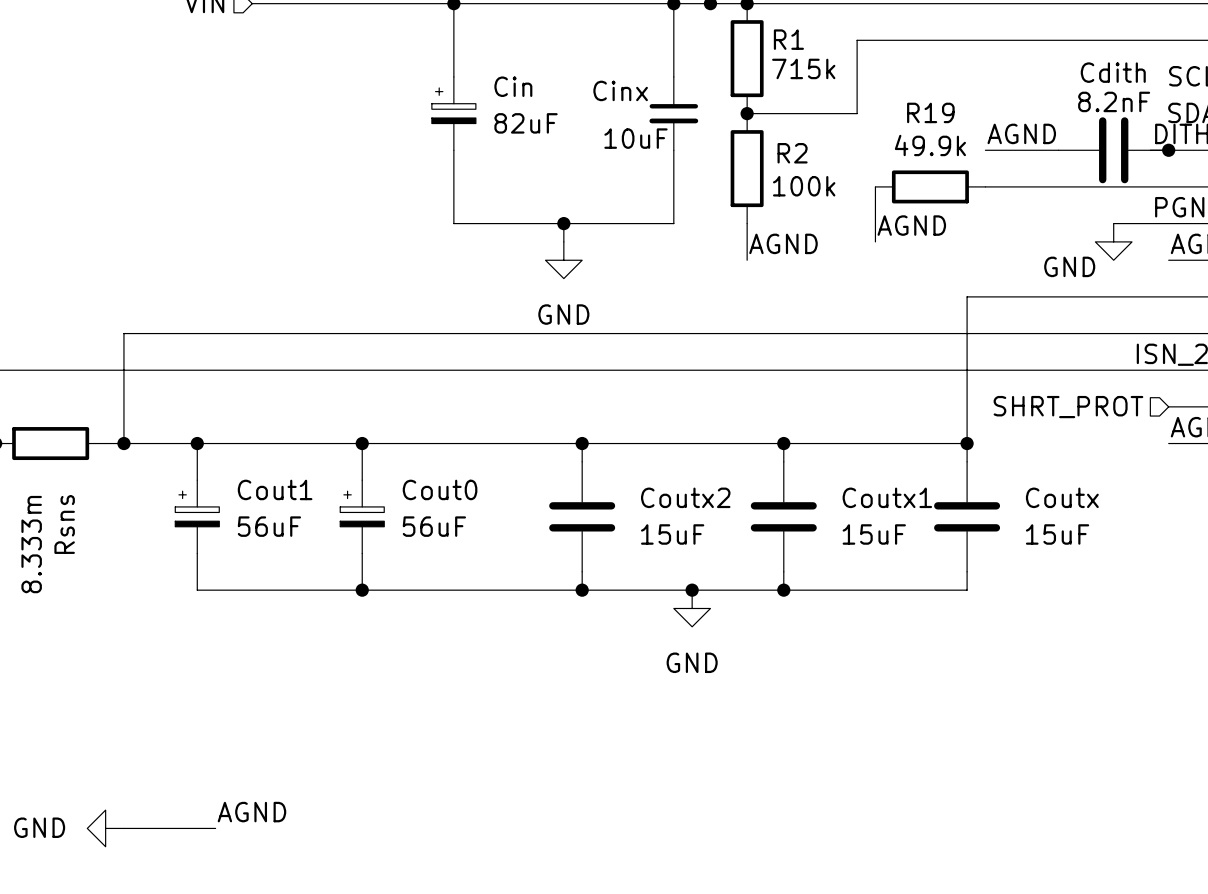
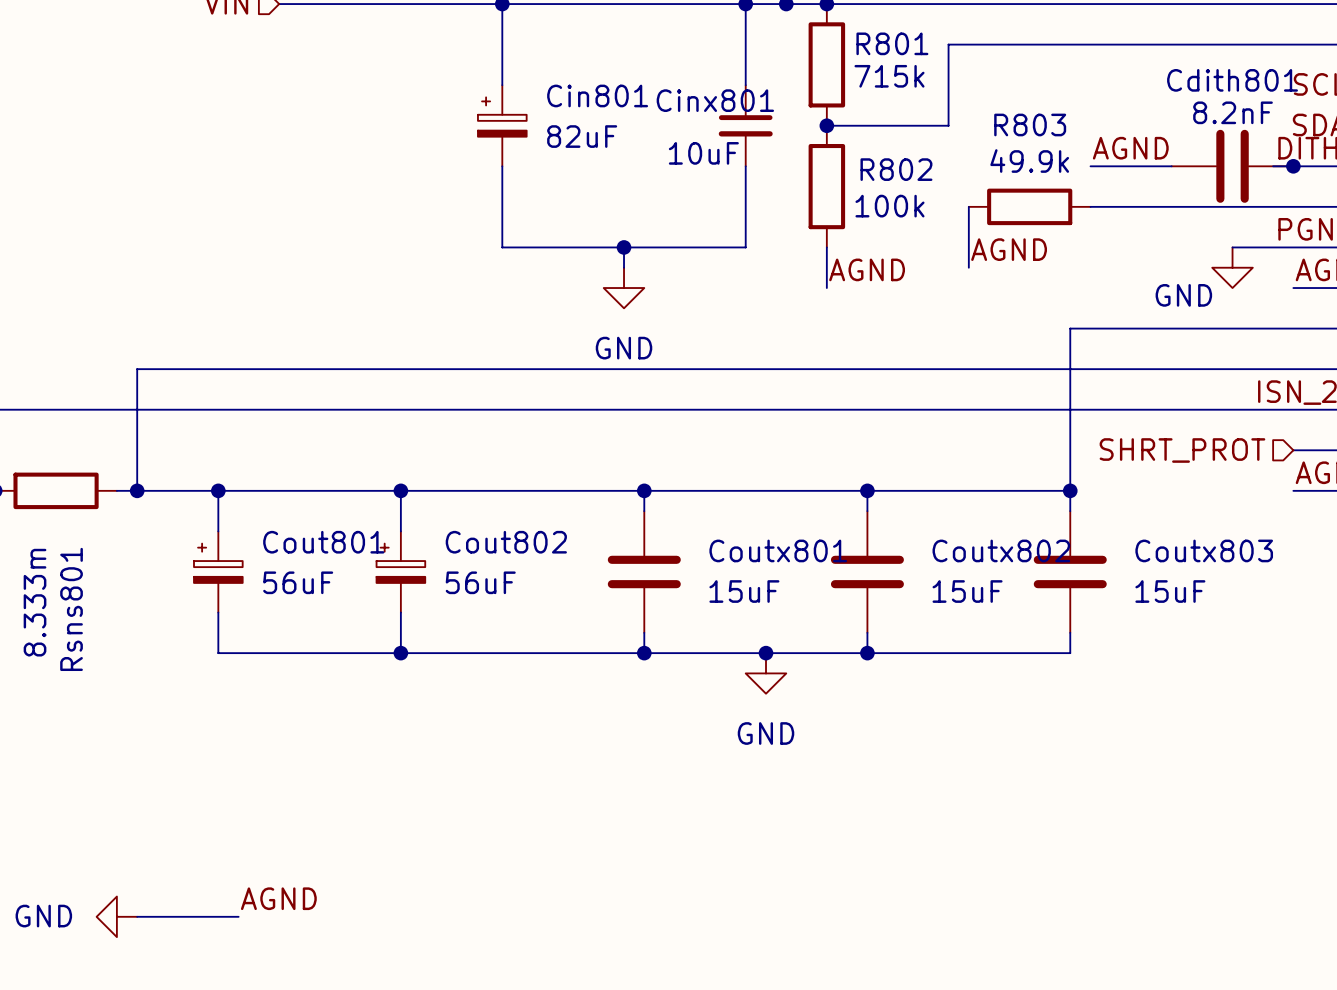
R1 name: R1 (788, 39) -> R801 (892, 43)
Cdith name: Cdith (1113, 72) -> Cdith801 (1232, 80)
Cin name: Cin (513, 86) -> Cin801 (597, 95)
Cinx name: Cinx (620, 90) -> Cinx801 (715, 100)
R19 name: R19 (930, 112) -> R803 (1030, 124)
R2 name: R2 (792, 153) -> R802 (896, 169)
Cout1 name: Cout1 (275, 489) -> Cout801 (323, 542)
Cout0 name: Cout0 (440, 489) -> Cout802 (506, 542)
Coutx2 name: Coutx2 (685, 497) -> Coutx801 (778, 550)
Coutx1 name: Coutx1 (887, 497) -> Coutx802 (1001, 550)
Coutx name: Coutx (1062, 497) -> Coutx803 (1204, 550)
Rsns name: Rsns (64, 524) -> Rsns801 (71, 609)

